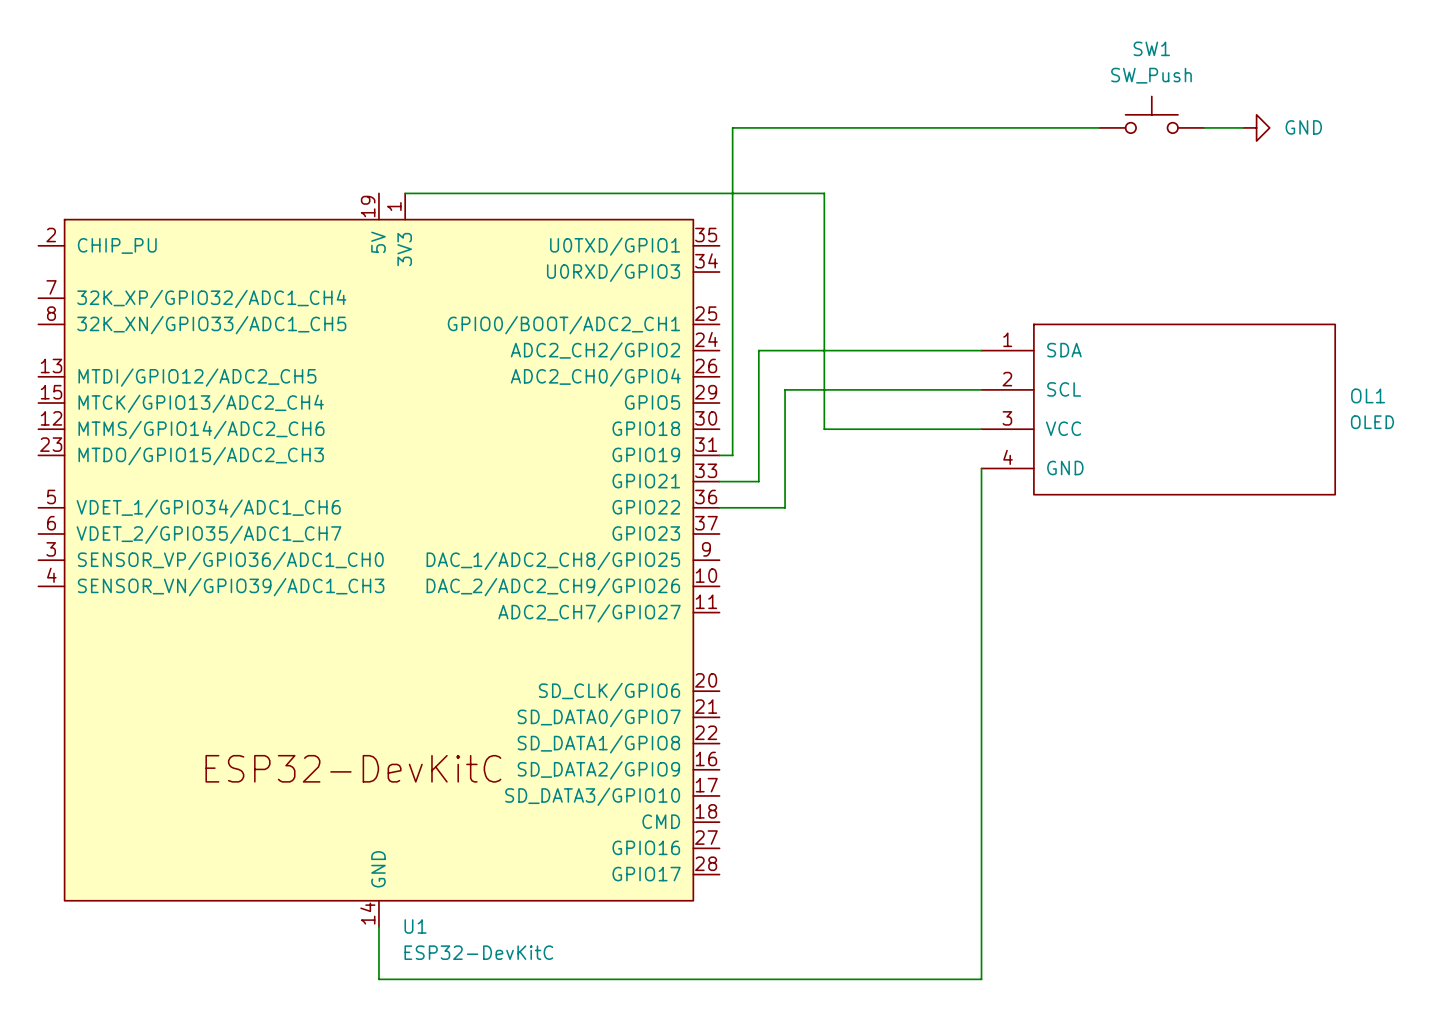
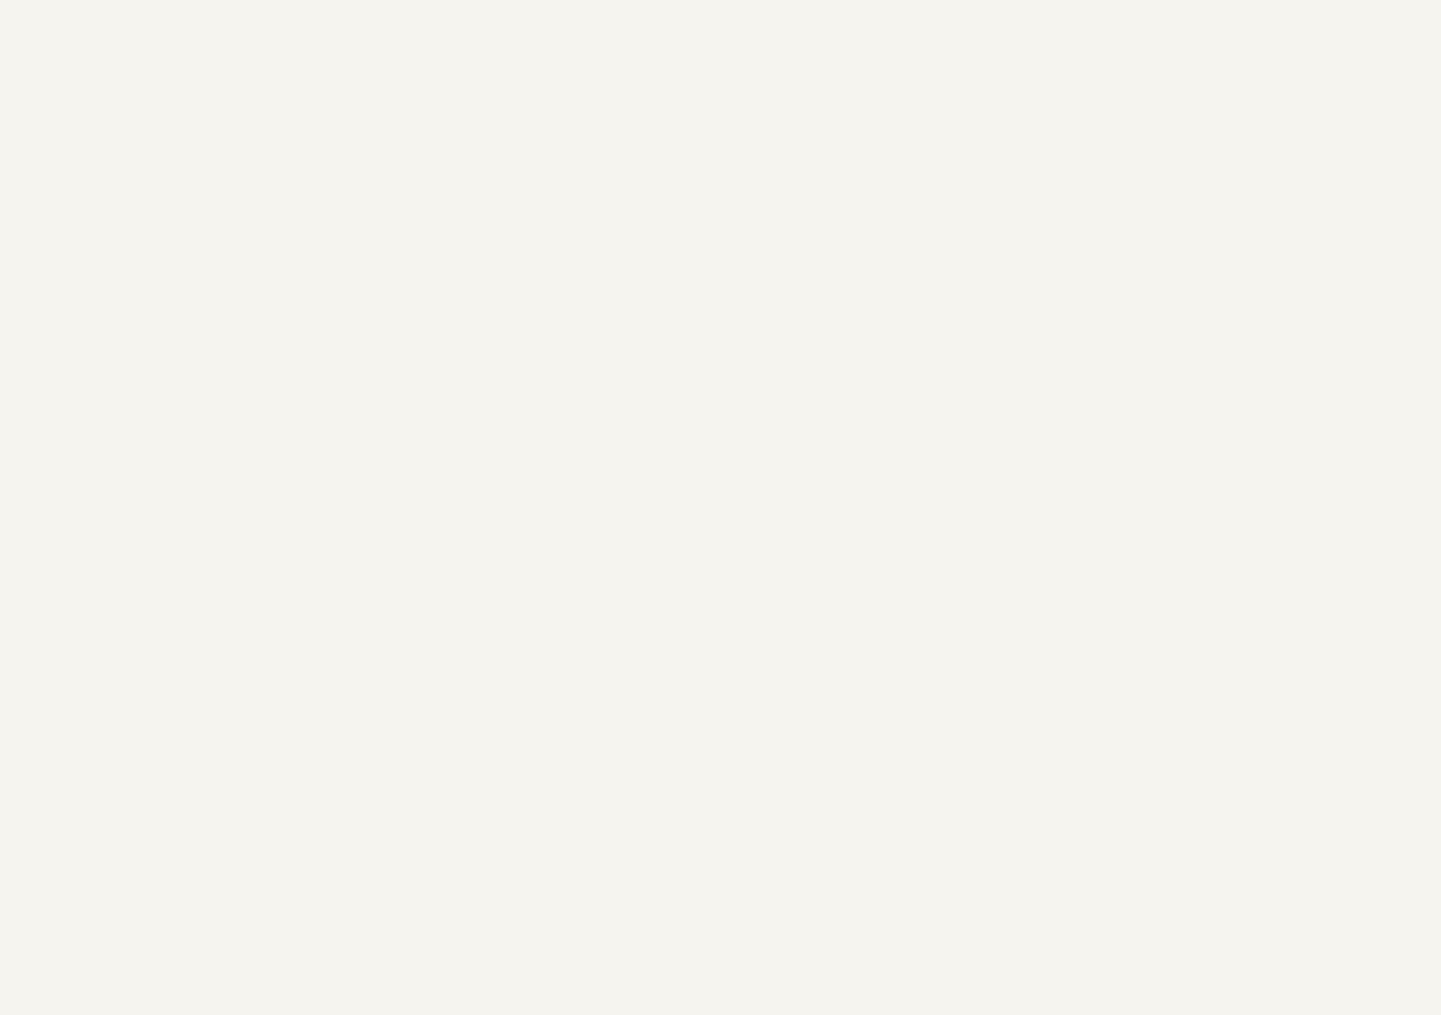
SW1: SW_Push (1151, 114) -> none
wire: (1099, 127) (732, 127) (732, 455) (719, 455) -> none
wire: (1204, 127) (1243, 127) -> none
power symbol: GND (1256, 127) -> none
wire: (405, 193) (824, 193) (824, 429) (981, 429) -> none
wire: (981, 350) (758, 350) (758, 481) (719, 481) -> none
wire: (981, 389) (785, 389) (785, 507) (719, 507) -> none
OL1: OLED (1158, 409) -> none
wire: (981, 468) (981, 979) (378, 979) (378, 926) -> none
U1: ESP32-DevKitC (378, 560) -> none

